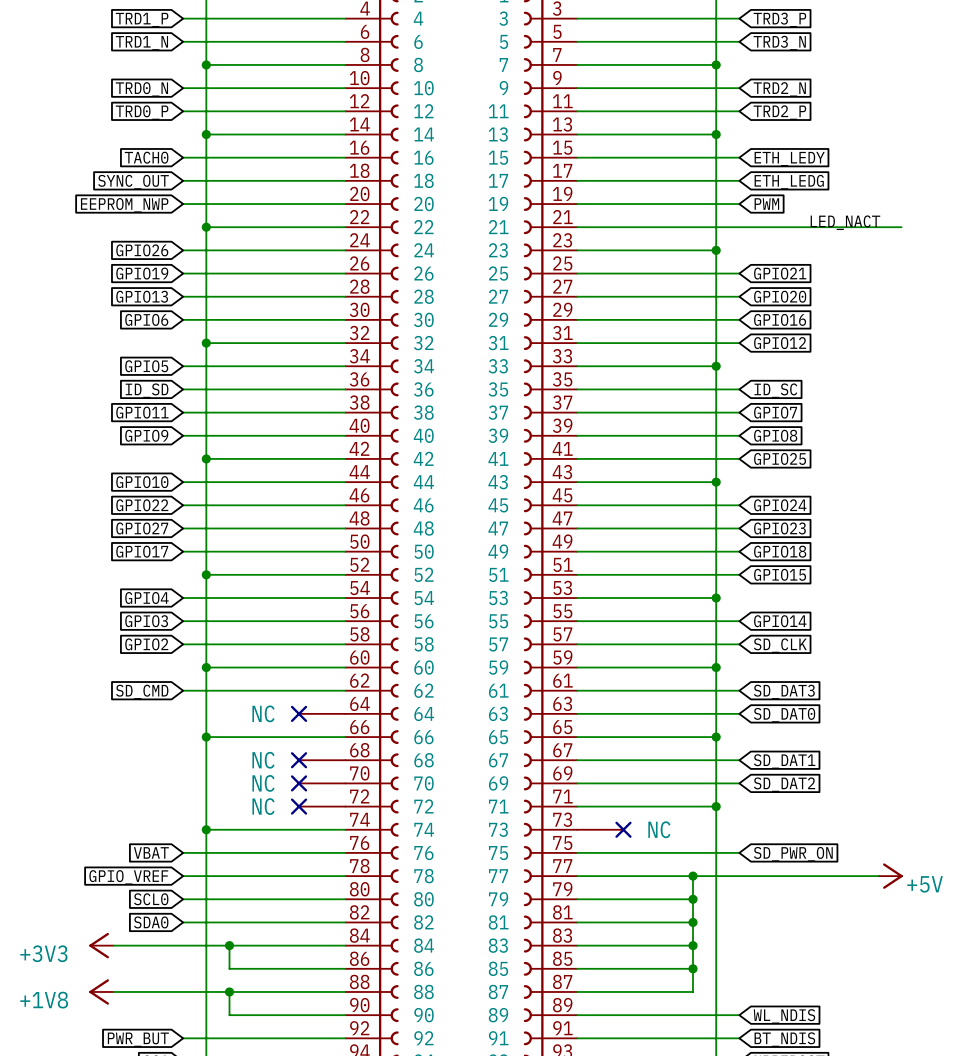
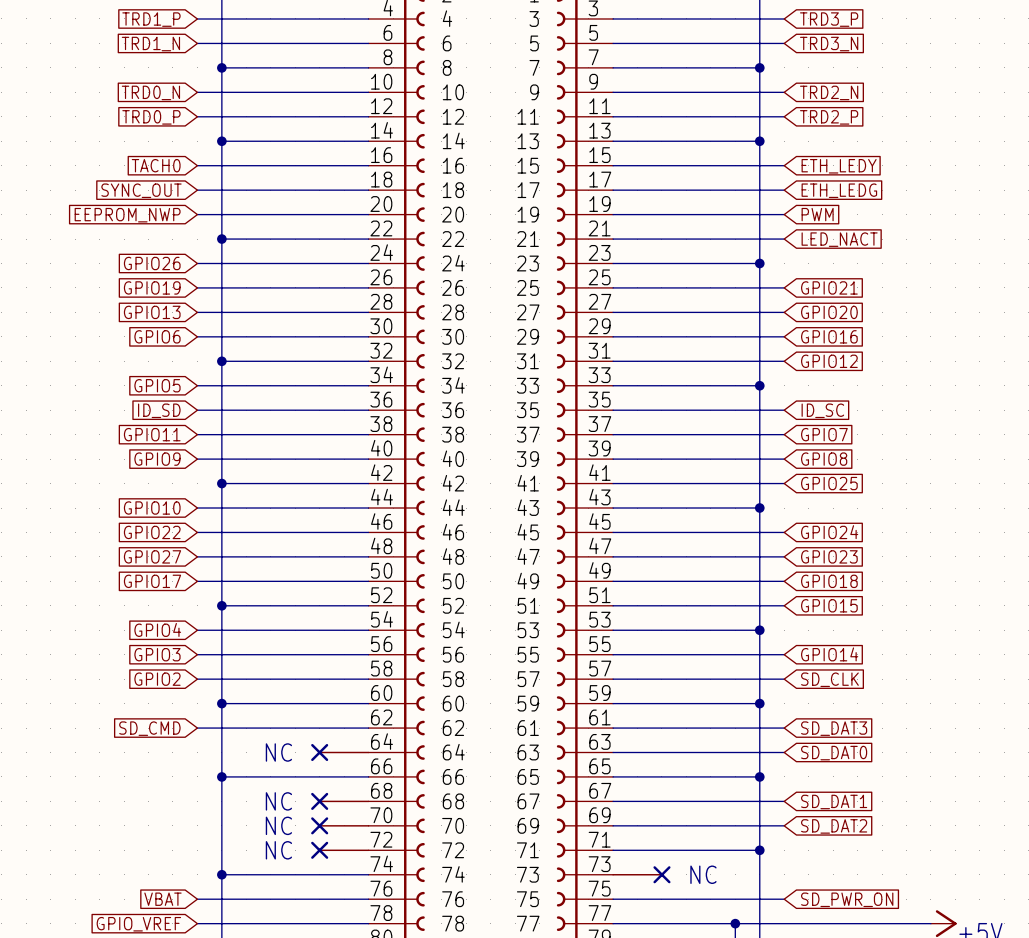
label: LED_NACT (845, 222) -> none
wire: (739, 227) (901, 227) -> none
global label: none -> LED_NACT (839, 239)

